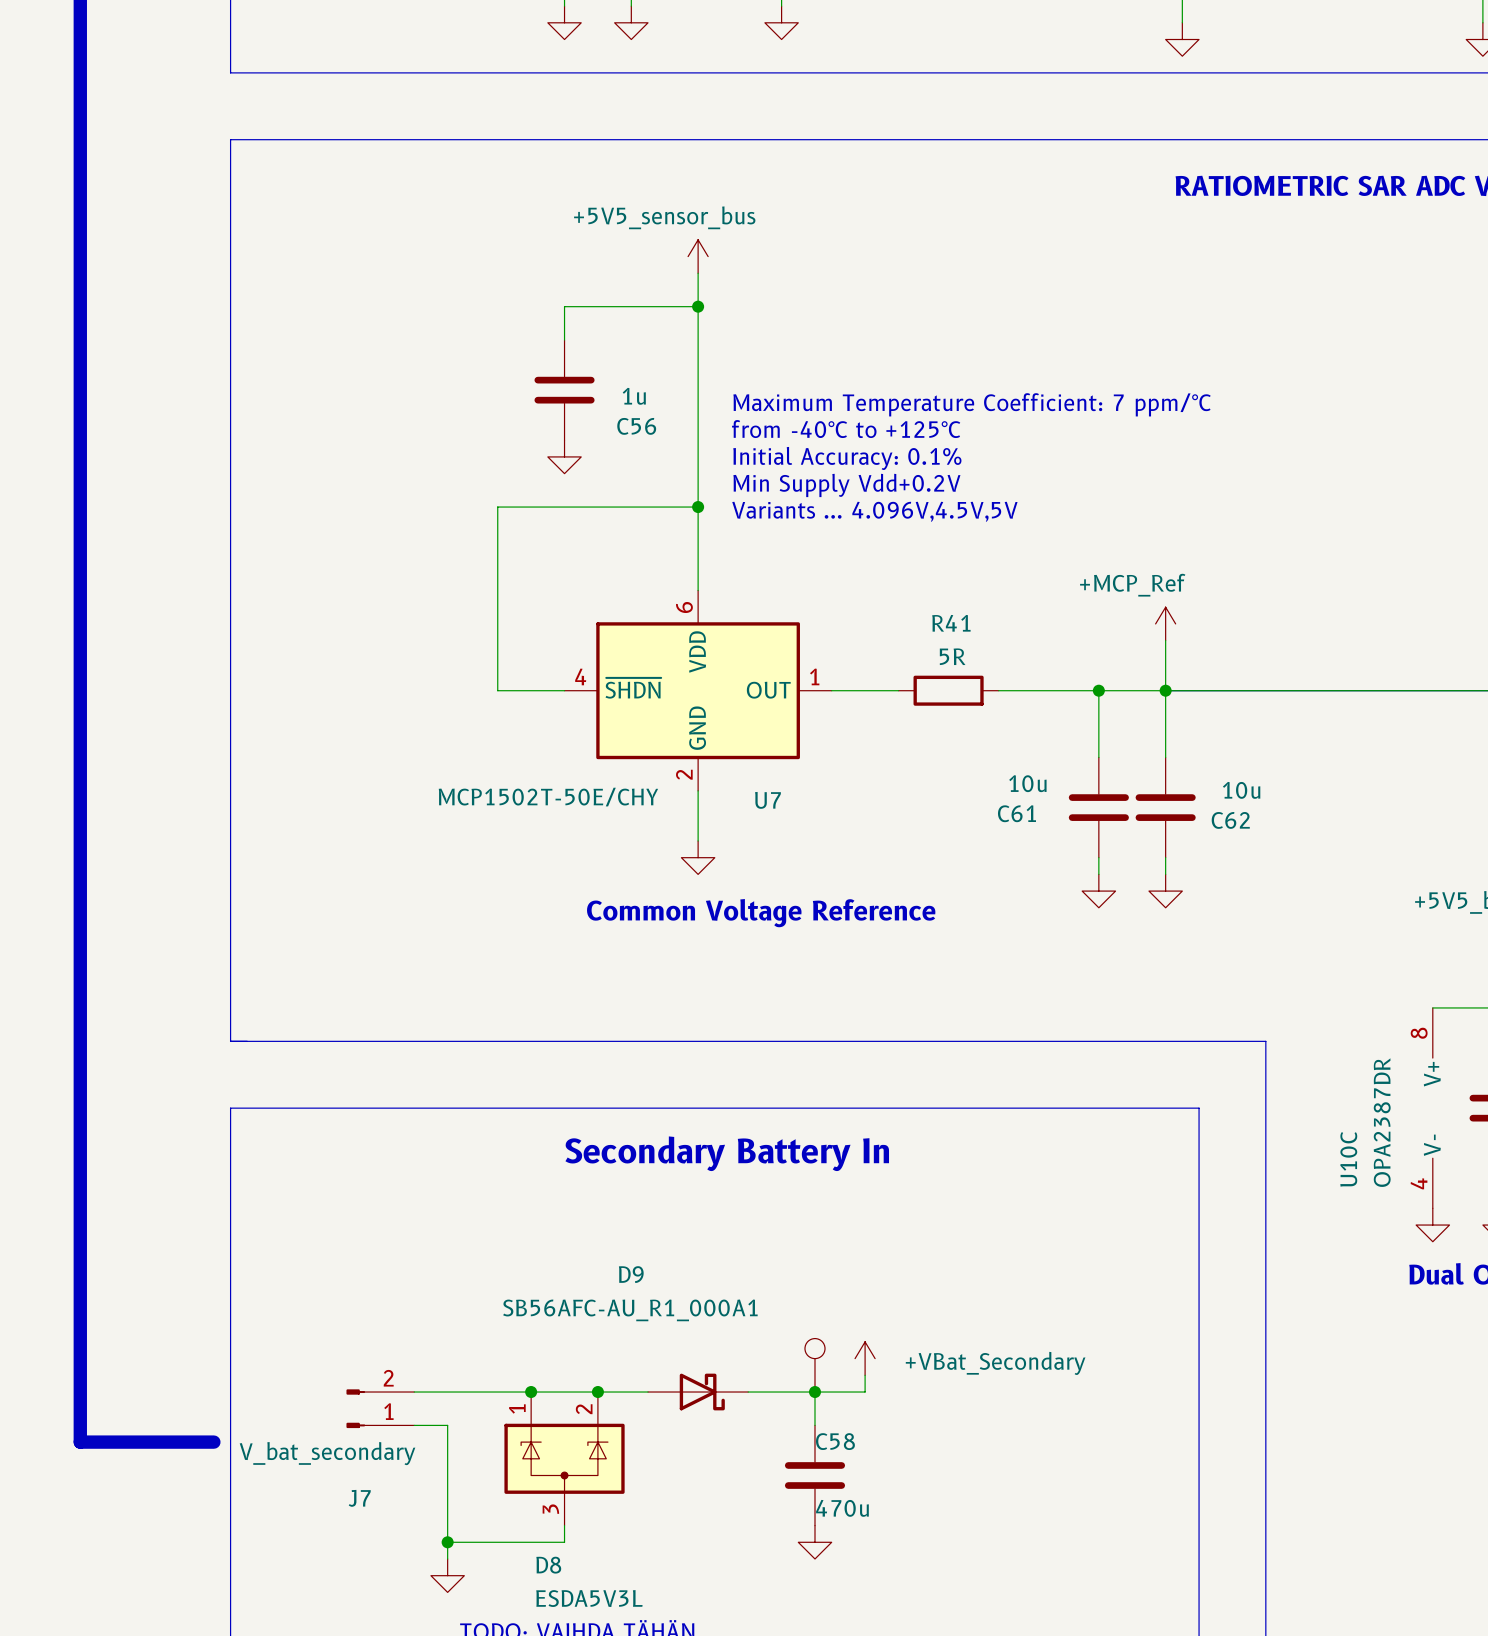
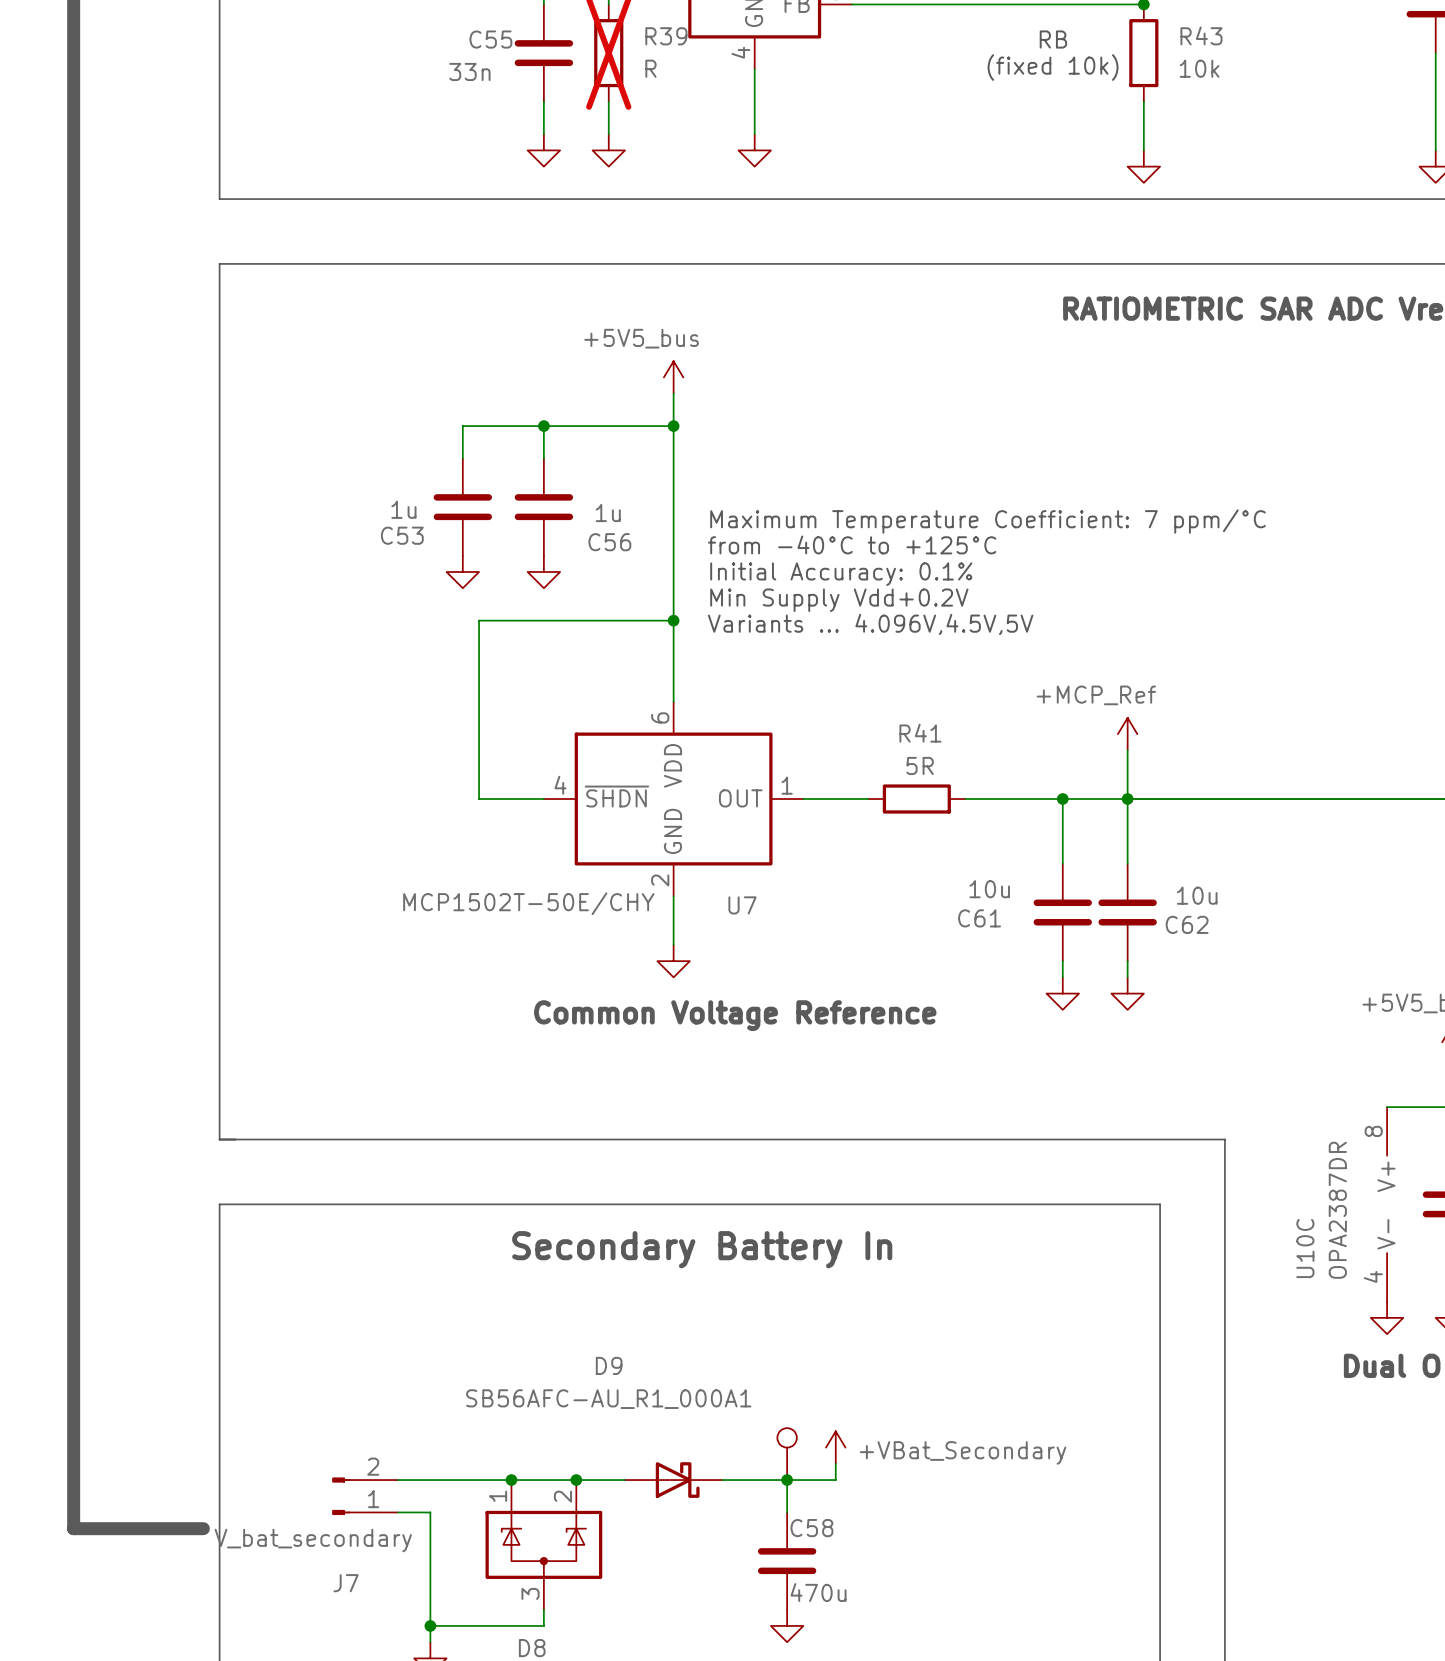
power symbol: +5V5_sensor_bus (698, 256) -> +5V5_bus (673, 377)
wire: none -> (543, 426) (462, 426) (462, 458)
junction: none -> (543, 426)
C53: none -> 1u (462, 507)
power symbol: none -> (462, 571)

